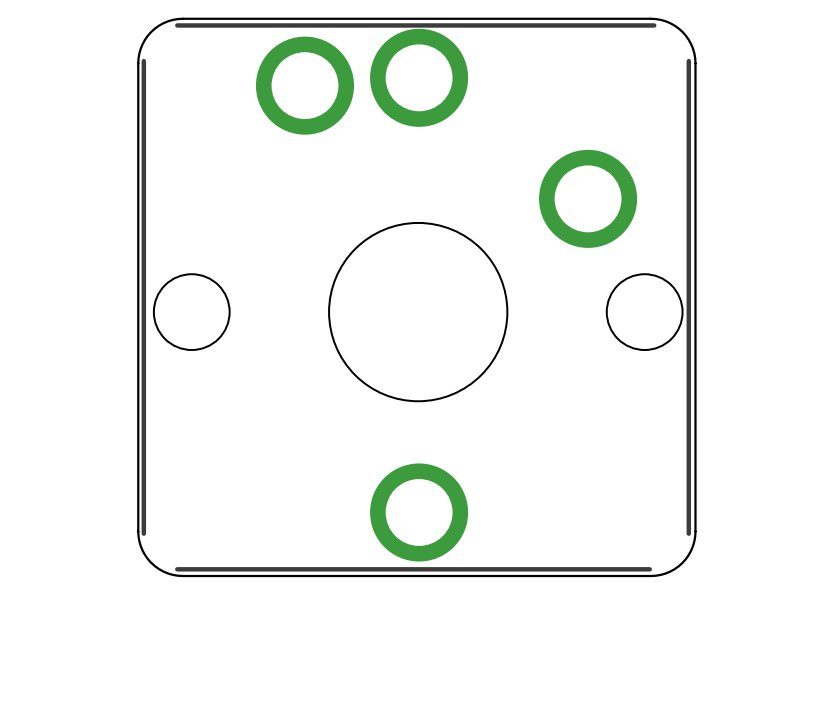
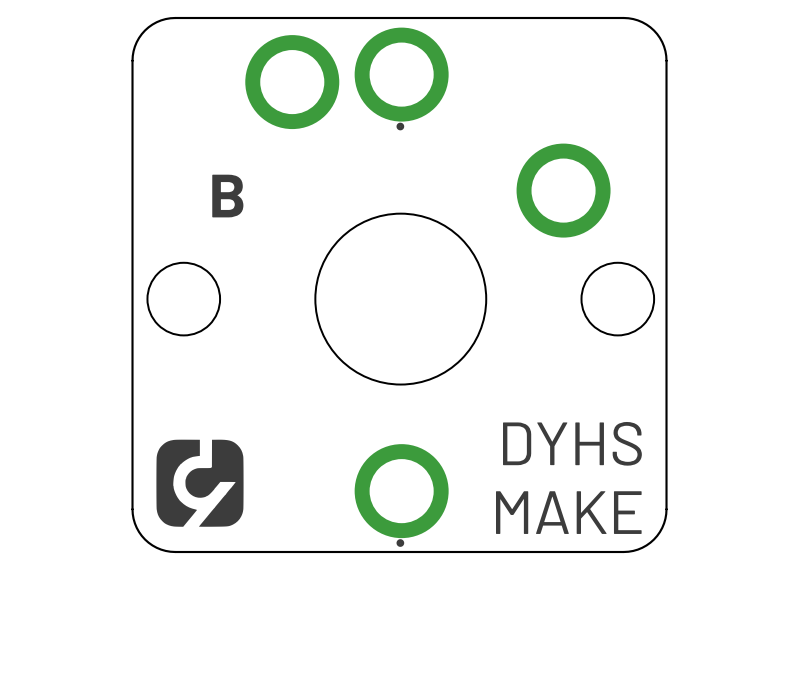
line: (654, 25) (177, 25) -> none
line: (143, 61) (143, 533) -> none
line: (688, 61) (688, 533) -> none
drawing: none -> [396, 122, 405, 131]
text: none -> B (227, 196)
drawing: none -> [156, 439, 244, 527]
text: none -> DYHS (572, 443)
text: none -> MAKE (568, 512)
drawing: none -> [396, 539, 405, 547]
line: (649, 569) (177, 569) -> none

